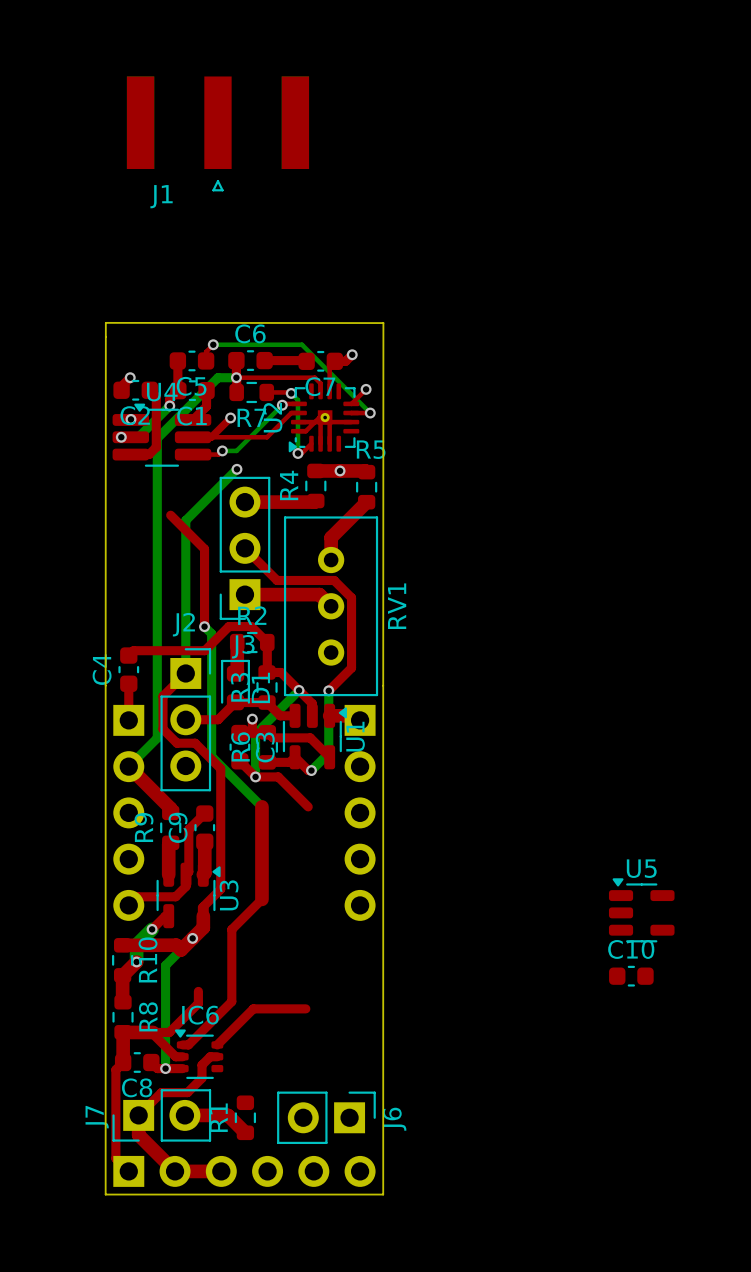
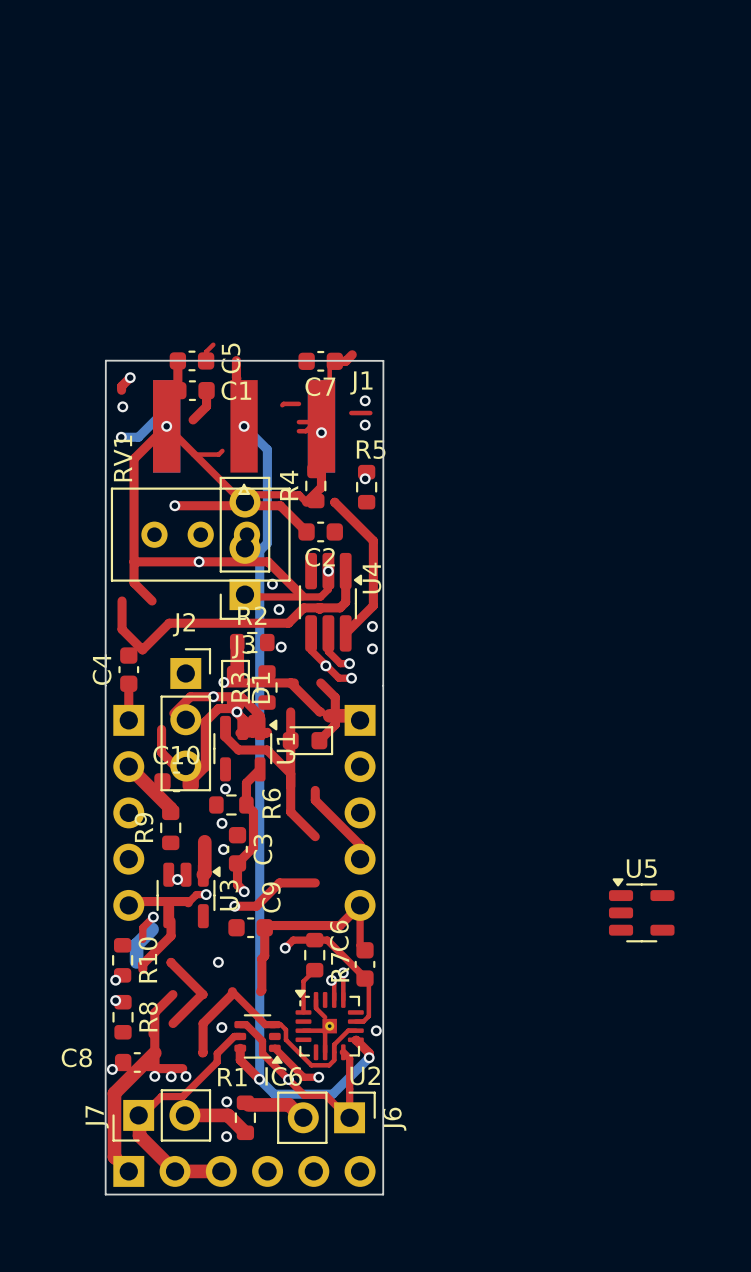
J1 position: (217, 133) -> (244, 437)
J1 name position: J1 (161, 196) -> J1 (361, 382)
bottom track: (213, 344) (301, 344) (370, 413) -> none
via: (213, 344) -> none
via: (352, 354) -> none
C6 rotation: 0° (250, 360) -> 90° clockwise (365, 964)
C6 position: (250, 360) -> (365, 964)
top track: (306, 361) (264, 360) (268, 364) -> none
top track: (236, 377) (314, 377) (320, 383) (320, 391) -> none
bottom track: (236, 377) (218, 377) (157, 438) (157, 738) (128, 766) -> none
via: (236, 377) -> none
C5 name rotation: 0° (191, 386) -> 90° counterclockwise (230, 358)
C5 name position: C5 (191, 386) -> C5 (230, 358)
top track: (366, 389) (351, 403) -> none
via: (366, 389) -> none
C2 position: (135, 390) -> (320, 531)
top track: (149, 390) (156, 396) (156, 447) (149, 454) (130, 454) -> none
R7 rotation: 0° (251, 392) -> 90° clockwise (314, 955)
R7 position: (251, 392) -> (314, 955)
top track: (266, 392) (291, 393) -> none
bottom track: (291, 393) (297, 400) (297, 453) -> none
via: (291, 393) -> none
via: none -> (365, 400)
via: (169, 405) -> none
bottom track: (282, 405) (236, 450) (222, 450) -> none
via: (282, 405) -> none
top track: (298, 412) (291, 412) (267, 437) (193, 437) (211, 437) (230, 417) -> none
via: (370, 413) -> none
C1 name position: C1 (191, 416) -> C1 (236, 390)
via position: (230, 417) -> (244, 426)
U2 name position: U2 (272, 417) -> U2 (365, 1075)
U2 rotation: 0° (323, 417) -> 90° clockwise (329, 1024)
U2 position: (323, 417) -> (329, 1024)
via position: (130, 419) -> (122, 406)
top track: (329, 422) (351, 422) -> none
top track: (329, 422) (329, 443) -> none
via: none -> (365, 425)
via: none -> (166, 426)
bottom track: none -> (244, 426) (267, 449) (267, 543) (259, 550) (259, 1079)
top track: none -> (321, 426) (321, 487) (306, 502) (299, 494) (235, 494) (166, 426) (134, 458) (134, 582) (152, 600)
via: none -> (321, 432)
U4 rotation: 0° (161, 435) -> 90° clockwise (330, 602)
U4 position: (161, 435) -> (330, 602)
top track: (311, 443) (301, 453) (297, 453) -> none
via: (222, 450) -> none
via: (297, 453) -> none
bottom track: (236, 469) (185, 520) (185, 673) -> none
via: (236, 469) -> none
top track: (315, 470) (366, 472) -> none
via: (340, 470) -> none
via: none -> (365, 478)
top track: (315, 501) (244, 502) -> none
top track: none -> (334, 502) (373, 540) (373, 605) (345, 633)
top track: (366, 502) (331, 537) (331, 560) -> none
top track: none -> (174, 505) (280, 505) (306, 531)
via: none -> (174, 505)
top track: (170, 515) (204, 549) (204, 626) -> none
top track: (244, 548) (277, 580) (334, 580) (351, 597) (351, 668) (328, 690) -> none
top track: none -> (134, 561) (268, 561) (302, 596)
via: none -> (199, 561)
top track: none -> (328, 571) (328, 589) (320, 596) (259, 596) (256, 600)
via: none -> (328, 571)
top track: none -> (345, 571) (345, 602) (340, 607) (303, 607) (288, 623) (169, 623) (142, 649) (122, 629) (122, 600)
via: none -> (272, 584)
top track: (244, 594) (319, 594) (331, 606) -> none
RV1 rotation: 0° (331, 606) -> 90° clockwise (200, 534)
RV1 position: (331, 606) -> (200, 534)
RV1 name position: RV1 (397, 606) -> RV1 (123, 458)
via: none -> (279, 609)
bottom track: (204, 626) (211, 633) (211, 756) (261, 806) -> none
via: (204, 626) -> none
via: none -> (372, 626)
top track: none -> (311, 633) (311, 650) (338, 678) (351, 678)
top track: none -> (328, 633) (328, 651) (340, 663) (349, 663)
via: none -> (281, 647)
via: none -> (372, 648)
top track: (128, 655) (133, 650) (204, 650) (228, 626) (251, 626) (267, 642) (267, 672) (281, 672) (312, 703) (312, 715) -> none
via: none -> (349, 663)
via: none -> (325, 665)
top track: (185, 673) (163, 696) (163, 729) (177, 743) (195, 743) (220, 768) (220, 889) (203, 906) (203, 927) (181, 949) (176, 945) (122, 945) -> none
via: none -> (351, 678)
top track: none -> (223, 682) (294, 682)
via: none -> (223, 682)
top track: none -> (290, 682) (320, 711)
top track: none -> (320, 682) (335, 697) (335, 724) (319, 740)
board edge: (105, 685) (105, 322) (383, 323) (383, 685) -> (105, 685) (105, 360) (383, 360) (383, 685)
bottom track: (299, 690) (255, 733) (255, 776) -> none
via: (299, 690) -> none
bottom track: (328, 690) (328, 753) (311, 770) -> none
via: (328, 690) -> none
via: none -> (213, 696)
top track: (235, 702) (218, 719) (185, 719) -> none
top track: (235, 702) (267, 702) (280, 715) (295, 715) -> none
top track: none -> (290, 711) (290, 812) (315, 836)
top track: none -> (173, 713) (190, 696) (240, 696) (260, 715) (260, 727)
via position: (252, 719) -> (236, 712)
top track: none -> (225, 727) (225, 736) (238, 750) (267, 750) (290, 773)
top track: none -> (242, 727) (242, 718) (232, 708) (218, 708) (205, 721) (205, 767) (190, 781) (161, 752) (161, 729)
top track: (270, 732) (267, 732) (272, 737) (310, 737) (329, 757) -> none
U1 position: (314, 736) -> (245, 748)
part: none -> (307, 740)
R6 name position: R6 (240, 746) -> R6 (271, 803)
C3 position: (239, 747) -> (237, 849)
R6 rotation: 0° (267, 747) -> 90° clockwise (231, 804)
R6 position: (267, 747) -> (231, 804)
top track: (239, 761) (255, 776) (278, 776) (308, 806) -> none
top track: (267, 762) (289, 762) (295, 757) (308, 770) (311, 770) -> none
top track: none -> (260, 769) (246, 783) (246, 804) (253, 812) (253, 847) (237, 863) (237, 884) (244, 891)
via: (311, 770) -> none
via: (255, 776) -> none
via: none -> (225, 788)
top track: none -> (315, 790) (315, 800) (360, 845) (360, 859)
top track: (261, 806) (261, 899) (231, 929) (231, 1001) (188, 1044) (182, 1044) -> none
top track: (204, 813) (188, 829) (188, 871) (186, 874) (186, 886) (175, 896) (137, 896) (132, 901) -> (206, 894) (196, 894) (188, 902) (132, 901)
via: none -> (222, 823)
C9 rotation: 0° (204, 827) -> 90° clockwise (250, 927)
C9 position: (204, 827) -> (250, 927)
top track: (170, 842) (168, 844) (168, 874) -> none
via: none -> (223, 849)
via: none -> (177, 879)
top track: none -> (315, 882) (279, 882) (256, 906) (234, 906)
via: none -> (244, 891)
via: none -> (206, 894)
via: none -> (234, 906)
top track: (168, 916) (165, 916) (152, 929) -> none
top track: none -> (153, 917) (142, 927) (142, 939)
top track: none -> (171, 920) (171, 936) (142, 964) (142, 969)
via position: (152, 929) -> (153, 917)
bottom track: (192, 938) (165, 965) (165, 1068) -> none
via: (192, 938) -> none
top track: none -> (285, 948) (293, 940) (327, 940) (365, 977) (368, 982) (368, 1016) (363, 1021) (355, 1021)
via: none -> (285, 948)
top track: none -> (365, 950) (360, 945) (360, 905) (339, 925) (266, 925) (264, 927) (264, 955) (261, 958) (260, 991)
top track: (136, 961) (122, 975) (123, 1002) -> none
via: (136, 961) -> none
top track: none -> (171, 962) (203, 994) (173, 1023)
via: none -> (218, 962)
top track: none -> (314, 970) (303, 981) (303, 1012)
top track: none -> (343, 972) (343, 999)
via: none -> (343, 972)
C10 position: (631, 976) -> (176, 781)
via: none -> (115, 980)
top track: none -> (331, 980) (334, 983) (334, 999)
via: none -> (331, 980)
top track: (198, 991) (198, 1003) (169, 1032) (123, 1032) (123, 1062) (115, 1069) (115, 1158) -> (172, 994) (154, 1012) (154, 1053) (114, 1093) (115, 1158)
top track: none -> (316, 999) (316, 1008) (325, 1017)
via: none -> (115, 1000)
top track: (305, 1008) (253, 1008) (217, 1044) -> none
top track: none -> (240, 1024) (246, 1024) (262, 1040) (262, 1053) (304, 1095) (325, 1095) (349, 1119) (349, 1058) (343, 1052)
via: none -> (221, 1027)
top track: none -> (303, 1030) (325, 1030) (325, 1052)
top track: none -> (355, 1030) (348, 1030) (334, 1044) (334, 1060) (329, 1065) (311, 1065) (285, 1039) (285, 1029) (280, 1024) (265, 1024) (232, 991) (232, 994) (203, 1023) (202, 1053)
via: none -> (376, 1030)
top track: (153, 1034) (175, 1056) (182, 1056) -> none
top track: none -> (355, 1040) (369, 1053) (369, 1057)
top track: none -> (240, 1048) (240, 1060) (259, 1079)
top track: none -> (275, 1048) (303, 1077) (318, 1077)
IC6 rotation: 0° (199, 1054) -> 180° (258, 1039)
IC6 position: (199, 1054) -> (258, 1039)
top track: (217, 1056) (210, 1056) (202, 1065) (202, 1078) (187, 1092) (161, 1092) (138, 1115) (139, 1135) -> (240, 1036) (234, 1036) (217, 1053) (217, 1062) (182, 1096) (161, 1096) (139, 1118) (139, 1135)
bottom track: none -> (369, 1057) (332, 1094) (274, 1094) (259, 1079)
via: none -> (369, 1057)
via: (165, 1068) -> none
via: none -> (112, 1069)
via: none -> (154, 1076)
via: none -> (171, 1076)
via: none -> (185, 1076)
via: none -> (318, 1077)
via: none -> (259, 1079)
via: none -> (288, 1079)
C8 name position: C8 (137, 1087) -> C8 (76, 1057)
via: none -> (226, 1101)
top track: none -> (248, 1104) (289, 1104) (303, 1119)
R1 name rotation: 0° (218, 1117) -> 90° clockwise (232, 1077)
via: none -> (226, 1136)

